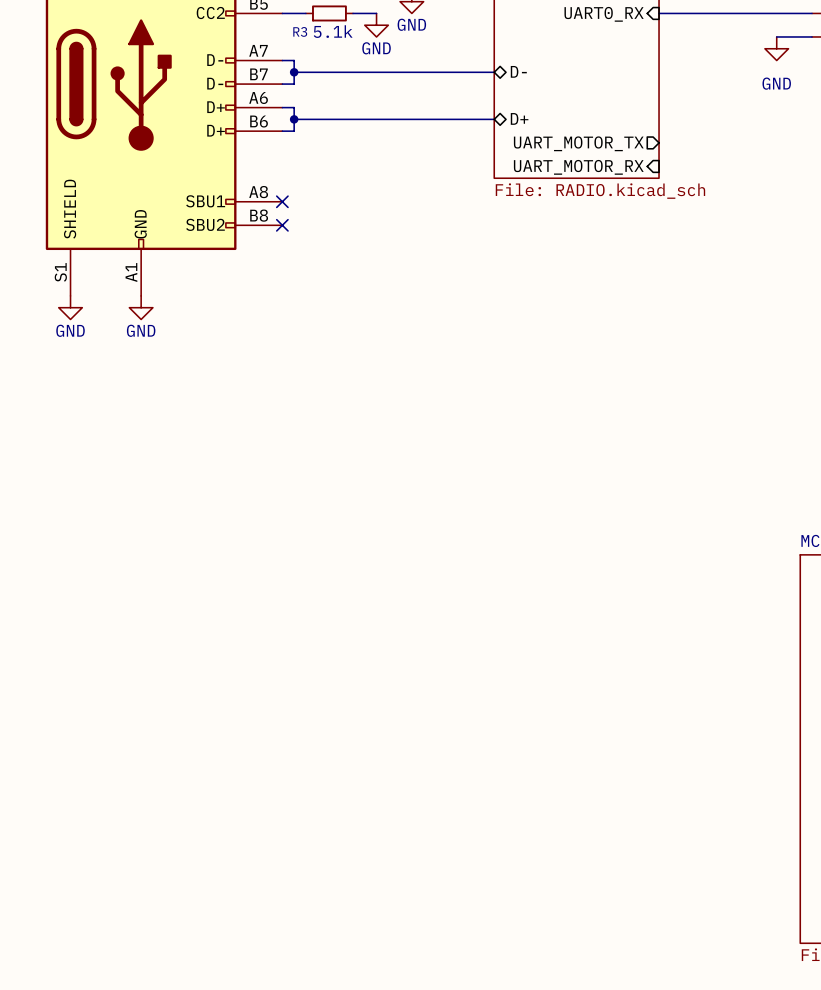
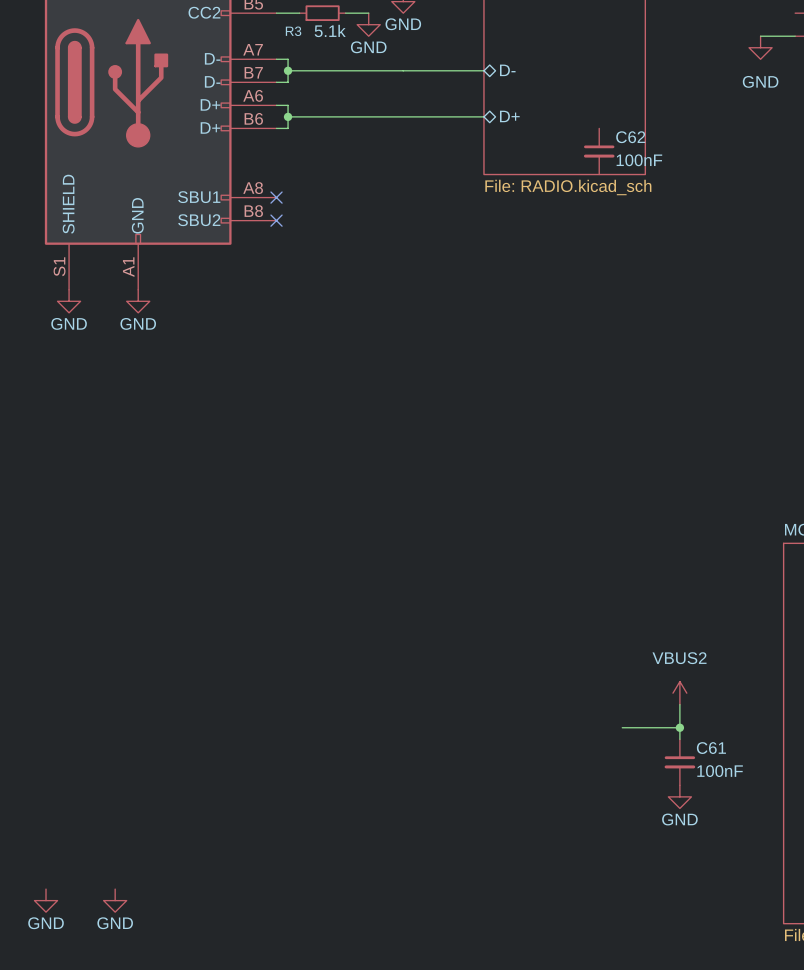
wire: (659, 13) (812, 13) -> none
sheet pin: UART0_RX (604, 14) -> none
sheet pin: UART_MOTOR_TX (578, 143) -> none
C62: none -> 100nF (599, 151)
sheet pin: UART_MOTOR_RX (578, 167) -> none
power symbol: none -> VBUS2 (679, 693)
wire: none -> (679, 704) (679, 739)
wire: none -> (622, 727) (679, 727)
junction: none -> (679, 727)
C61: none -> 100nF (679, 762)
power symbol: none -> GND (679, 796)
power symbol: none -> GND (46, 900)
power symbol: none -> GND (115, 900)

